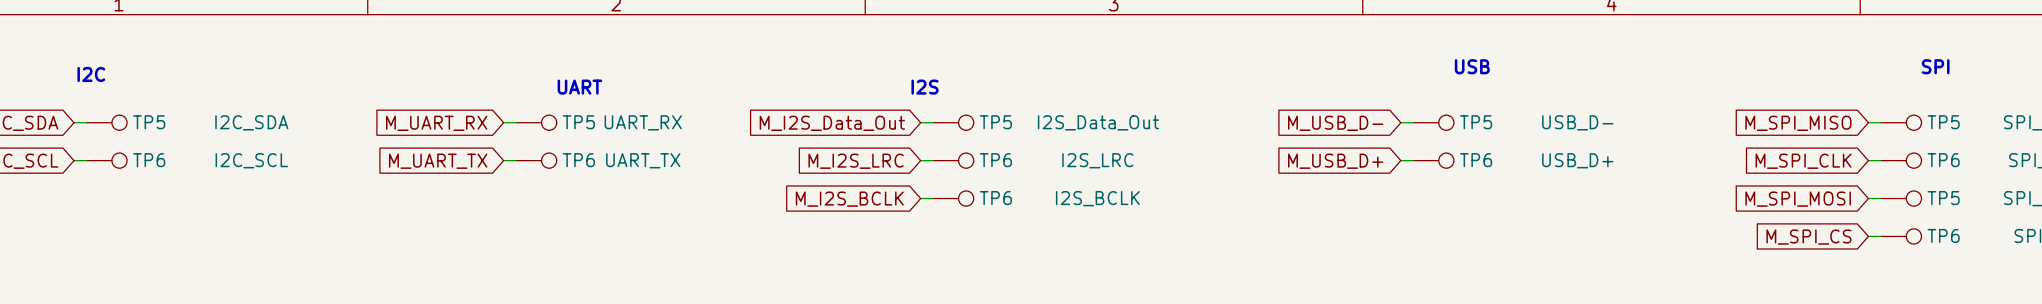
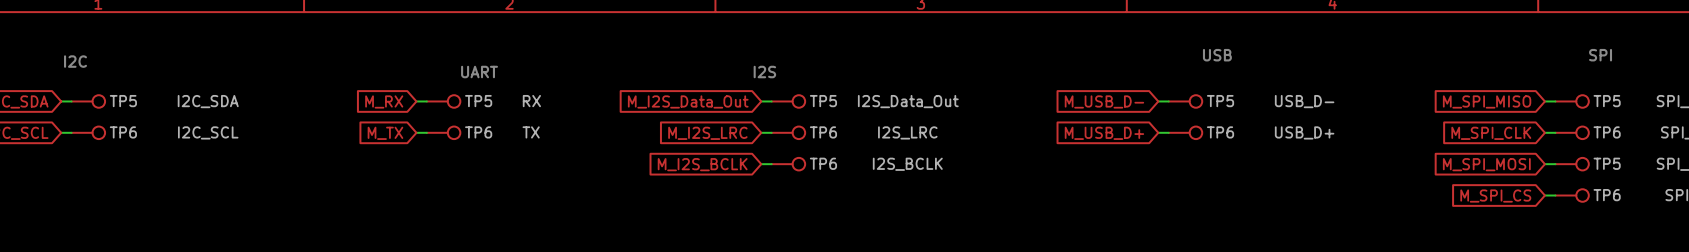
TP5 value: UART_RX (643, 122) -> RX (531, 101)
global label: M_UART_RX (436, 123) -> M_RX (384, 101)
TP6 value: UART_TX (643, 160) -> TX (531, 132)
global label: M_UART_TX (438, 161) -> M_TX (385, 133)

